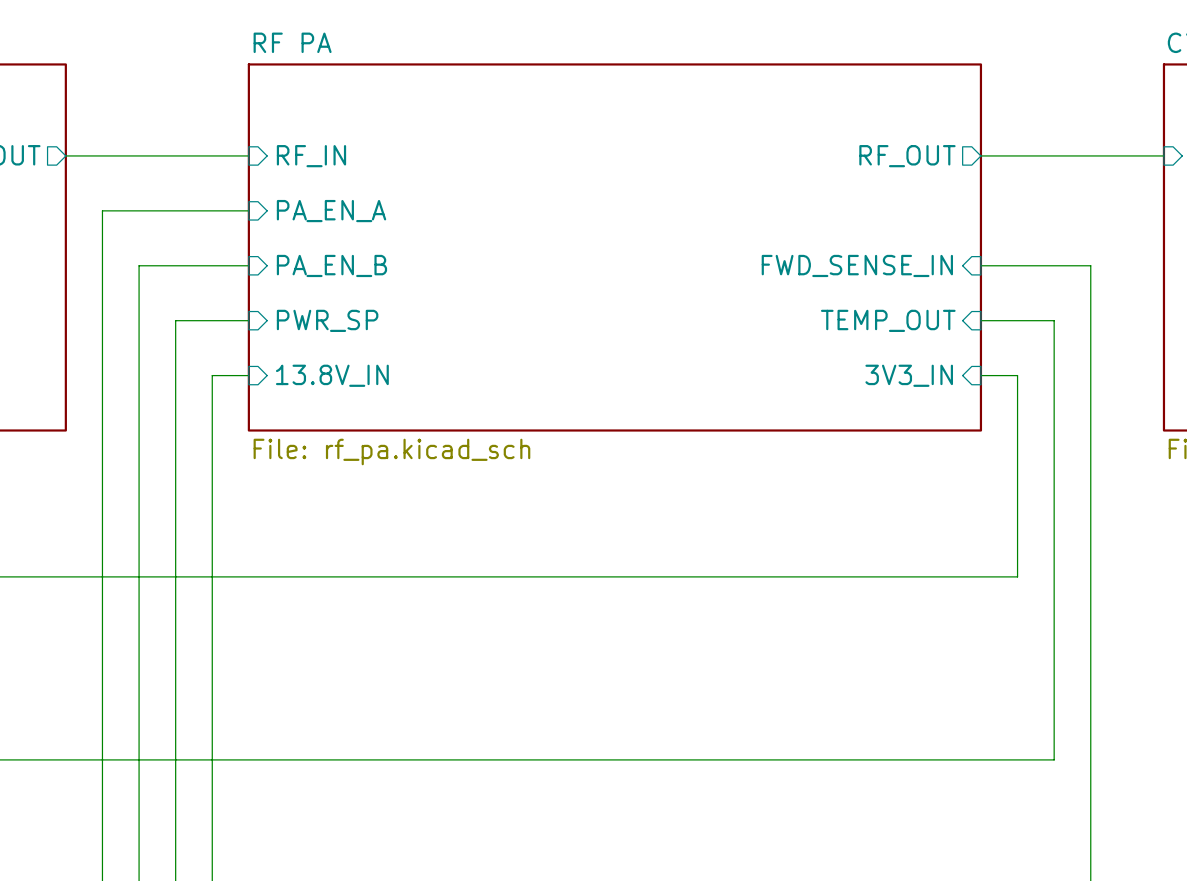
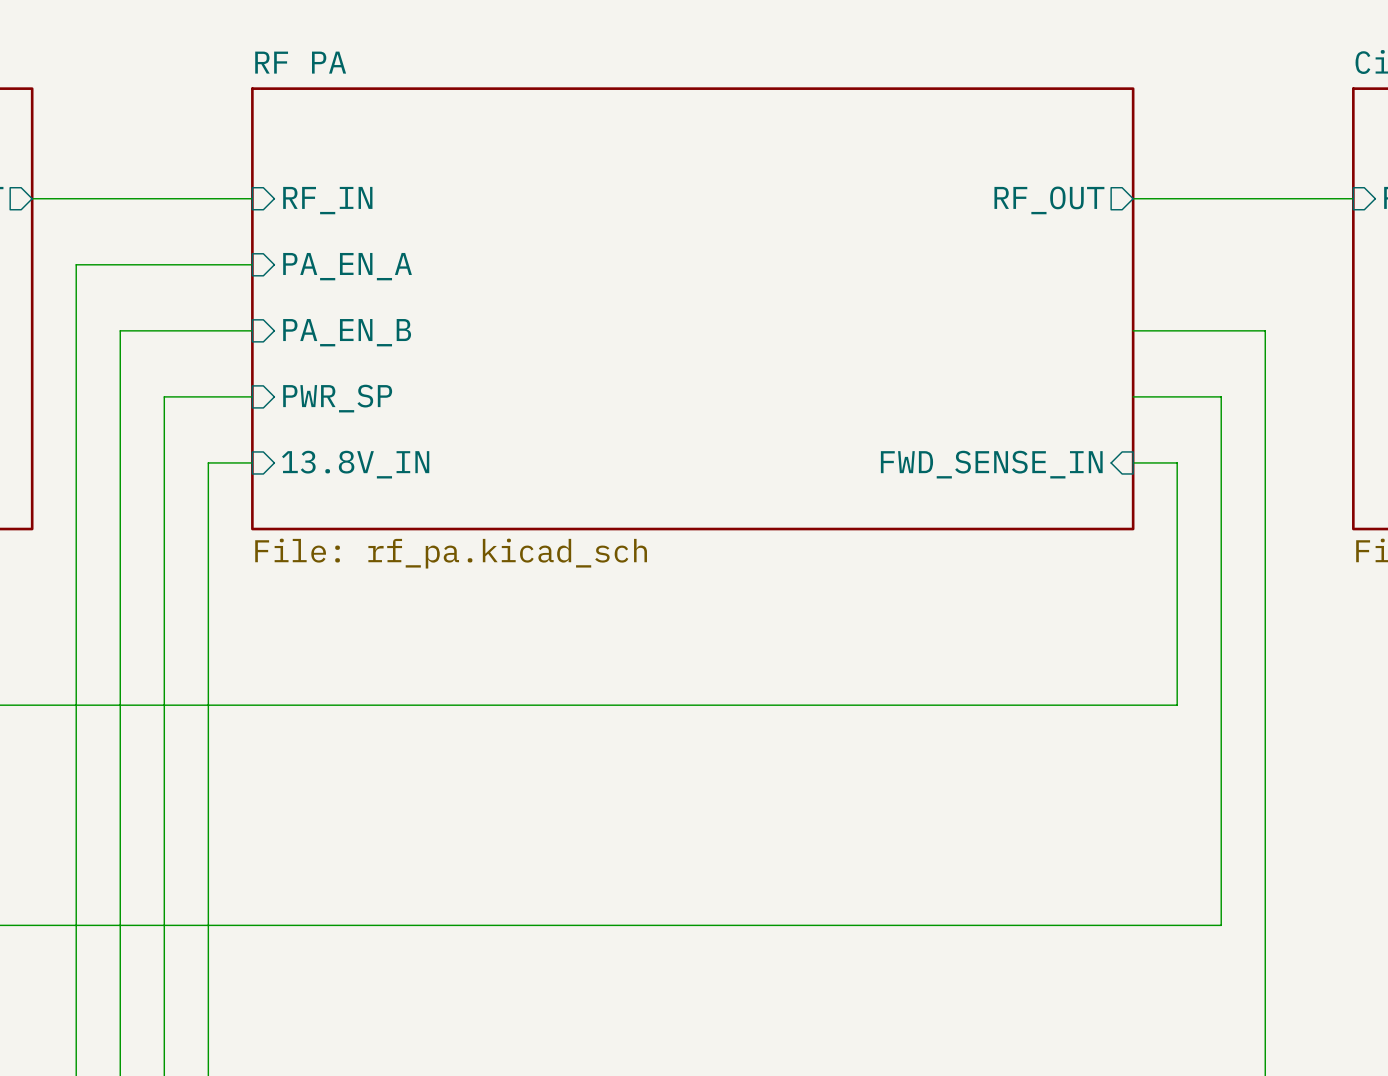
sheet pin: FWD_SENSE_IN (857, 265) -> none
sheet pin: TEMP_OUT (888, 320) -> none
sheet pin: 3V3_IN (909, 375) -> FWD_SENSE_IN (991, 464)

